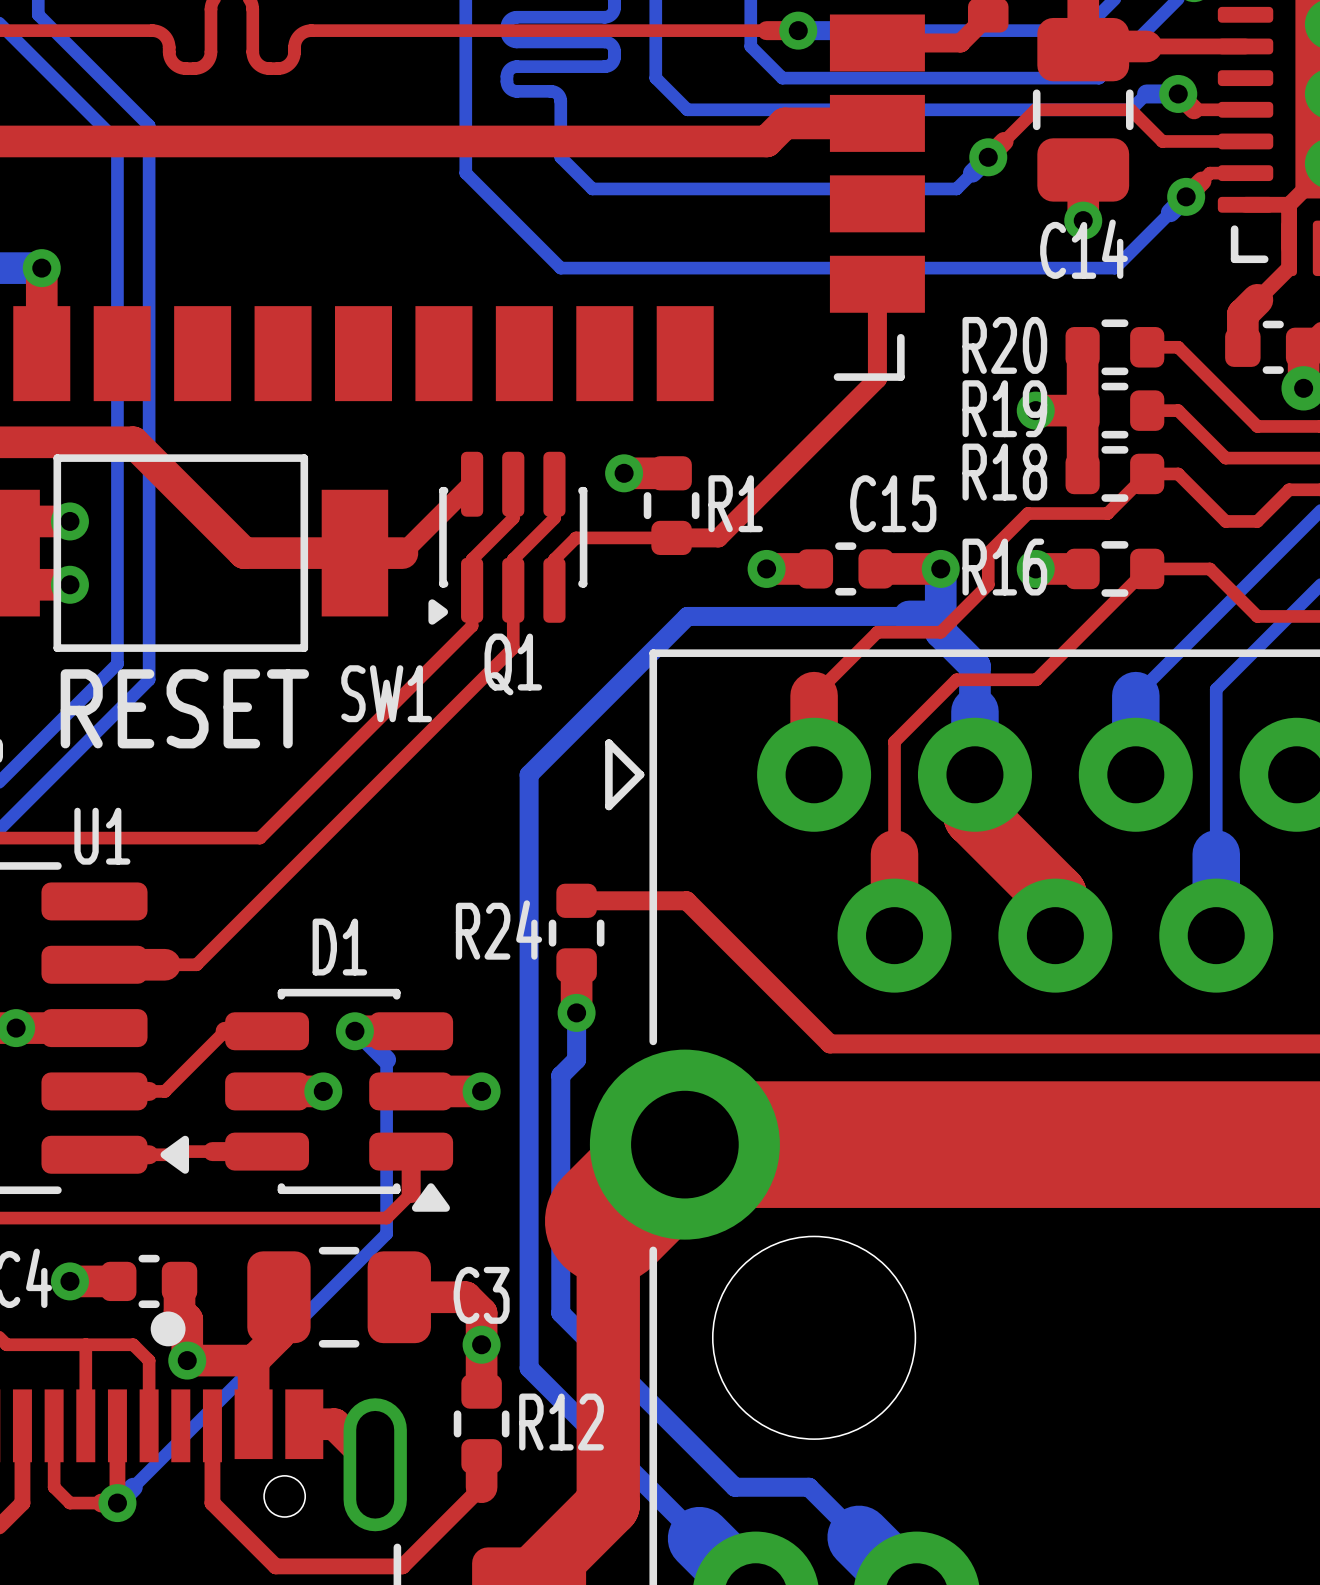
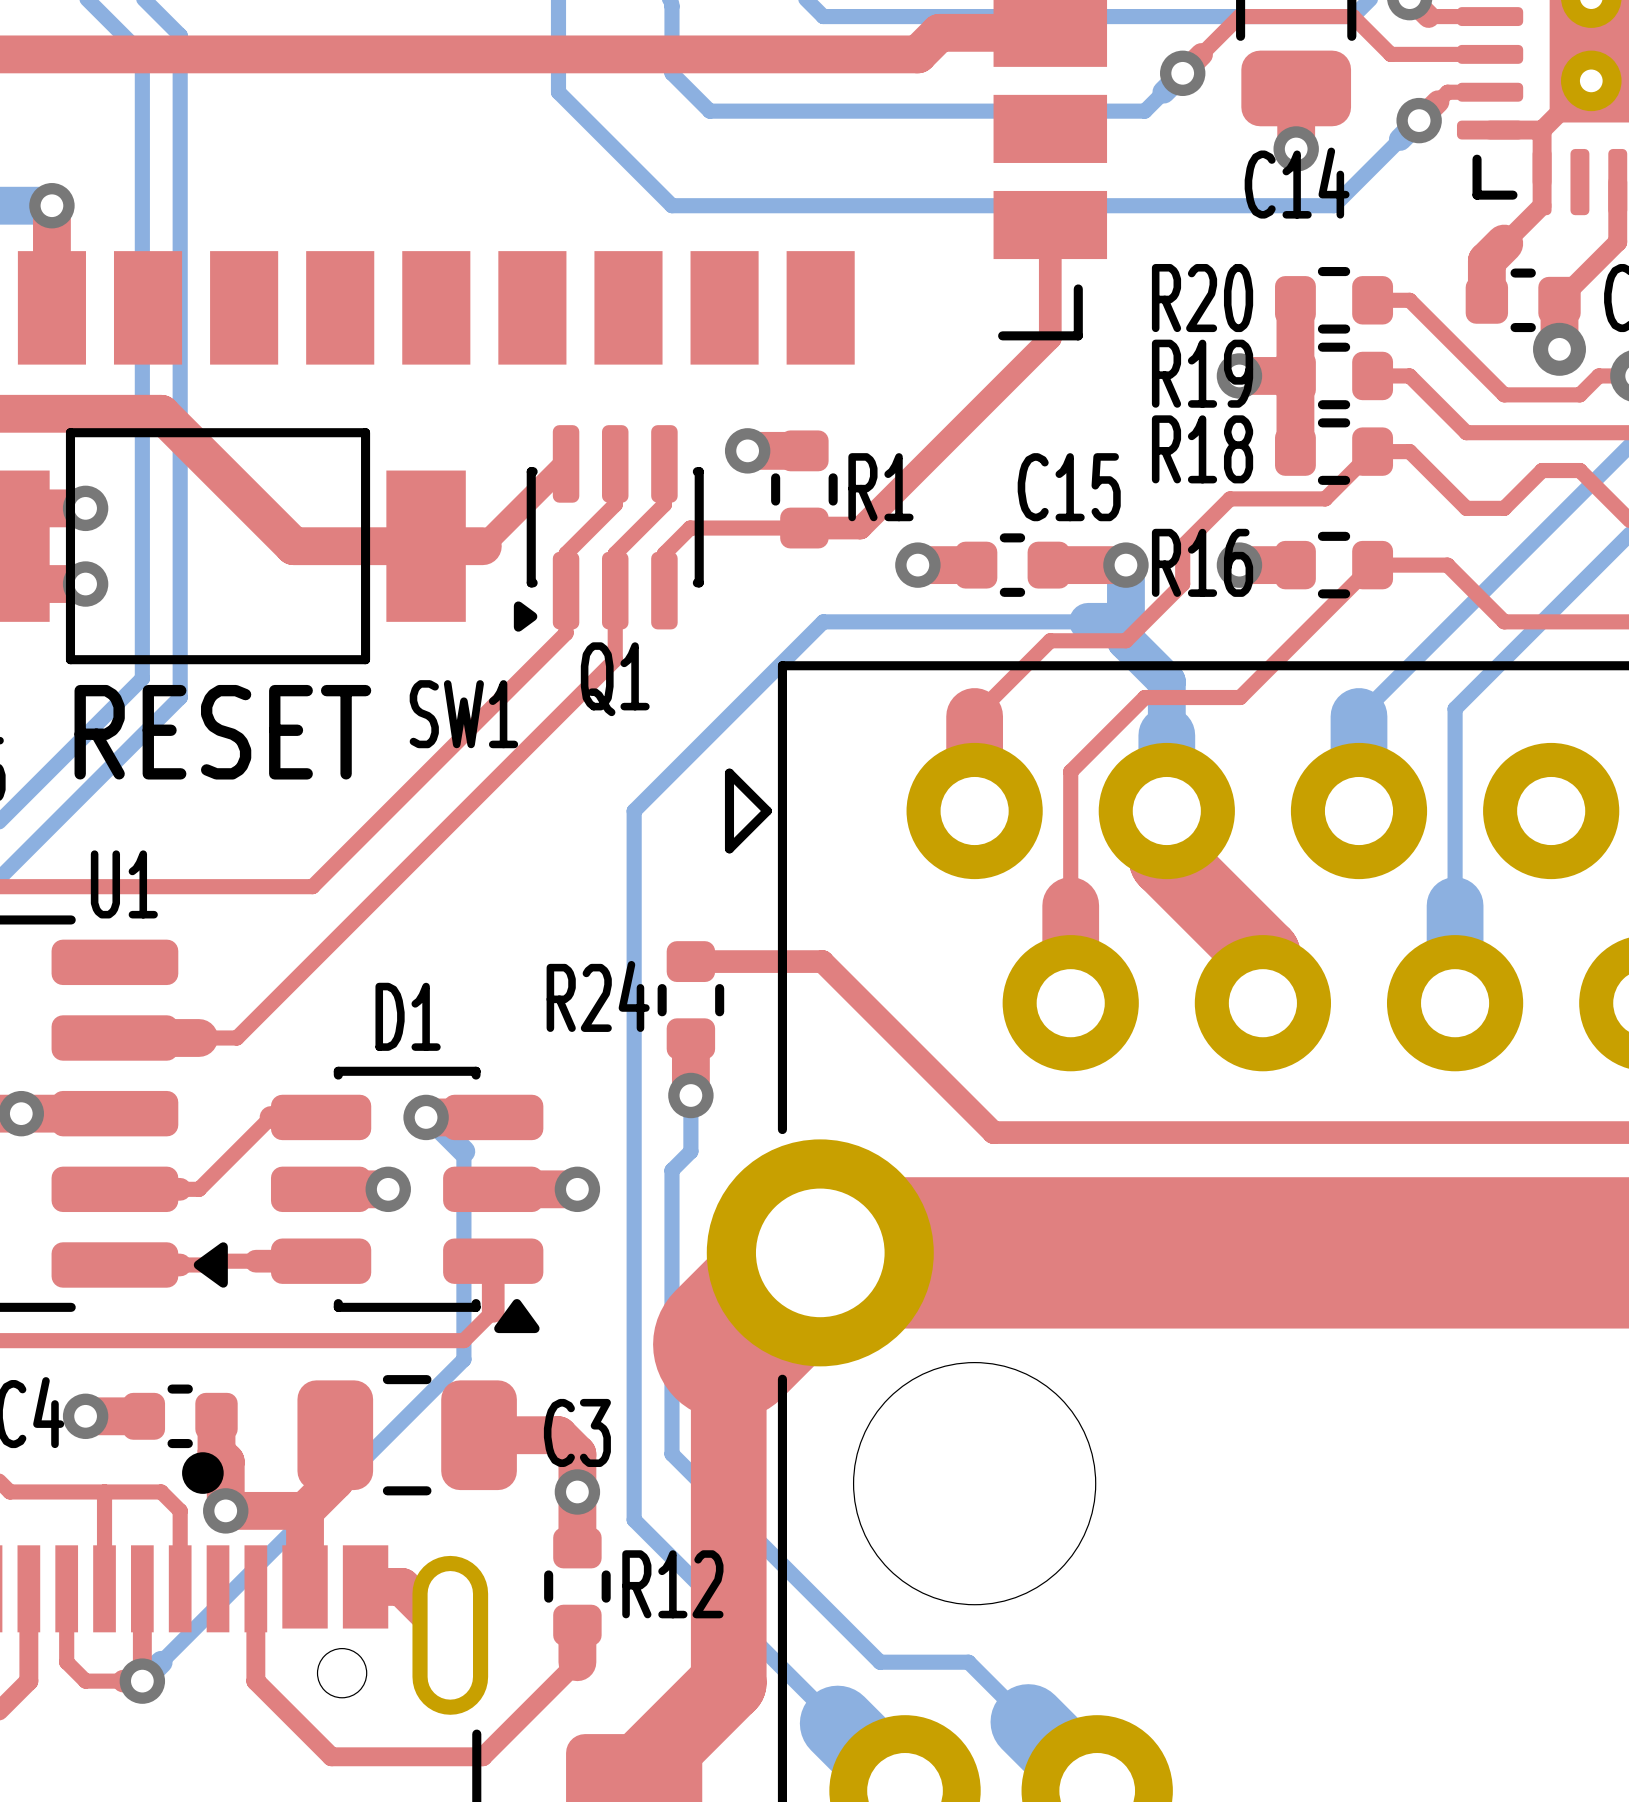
bottom track width: thick (909, 616) (687, 616) (529, 774) (529, 1368) (699, 1538) -> thin (1088, 621) (823, 621) (634, 811) (634, 1519) (837, 1723)
bottom track width: thick (576, 1012) (576, 1059) (560, 1075) (560, 1313) (734, 1487) (809, 1487) (859, 1537) -> thin (690, 1095) (690, 1151) (671, 1170) (671, 1454) (880, 1662) (968, 1662) (1028, 1721)

